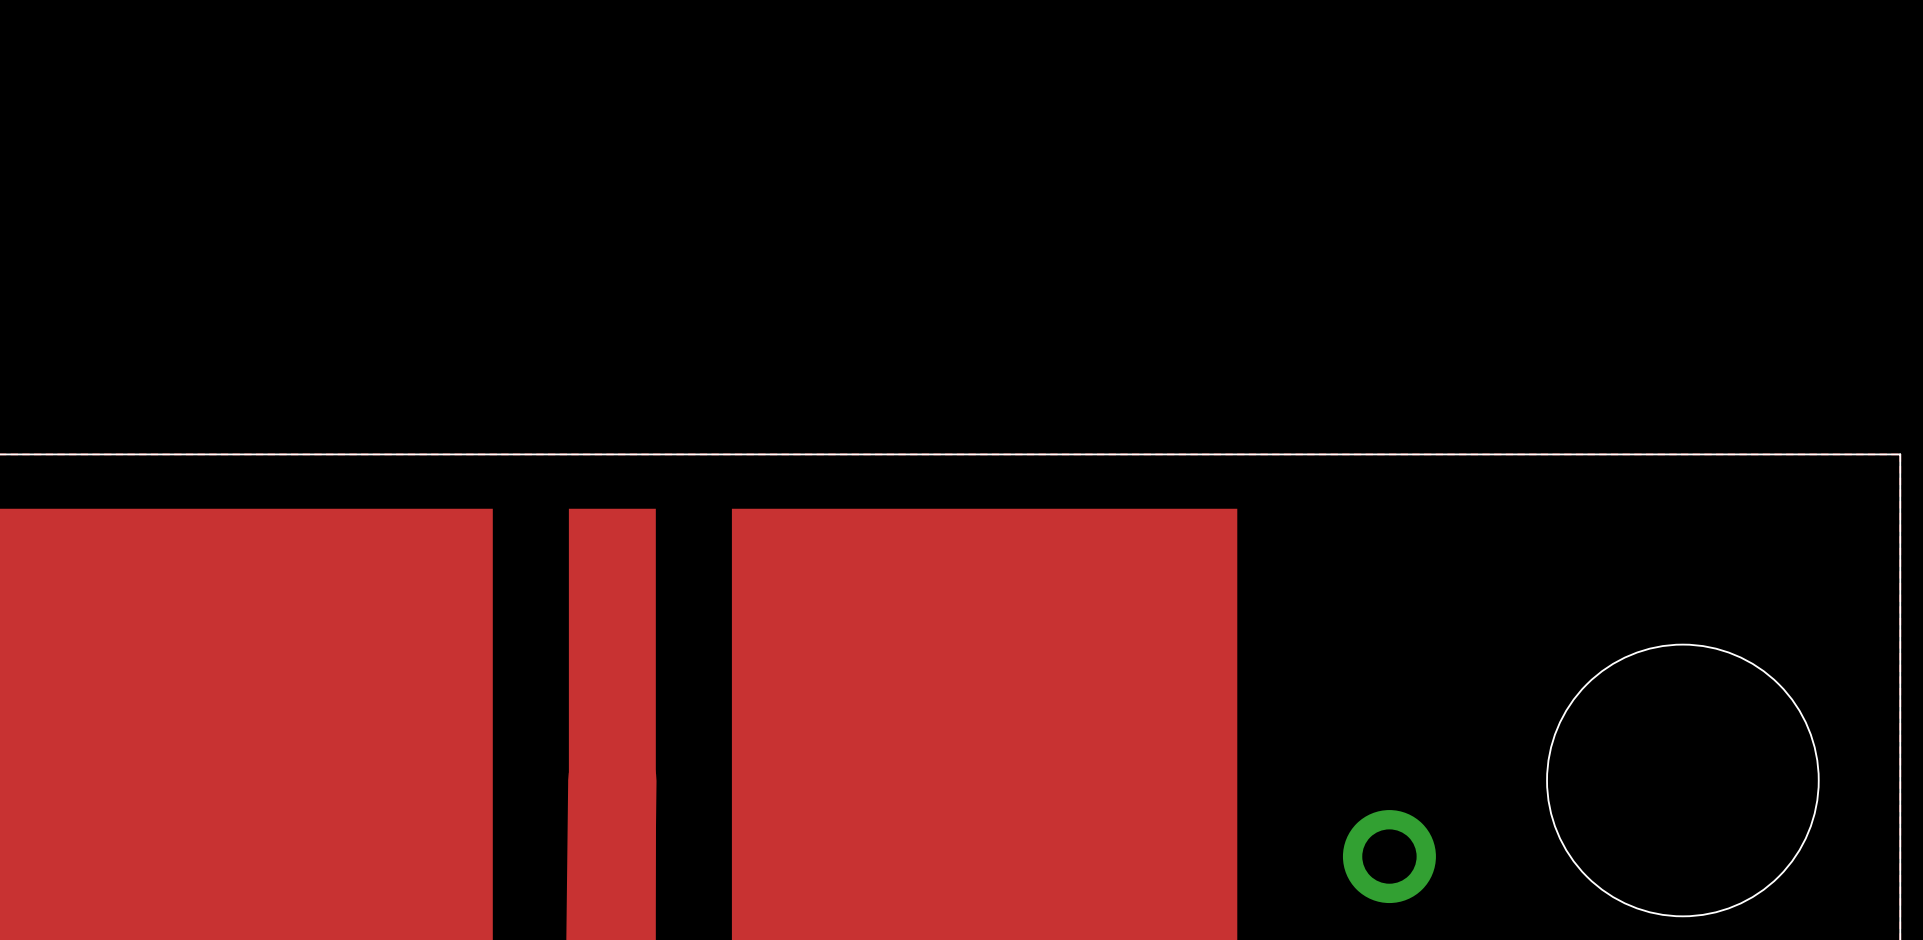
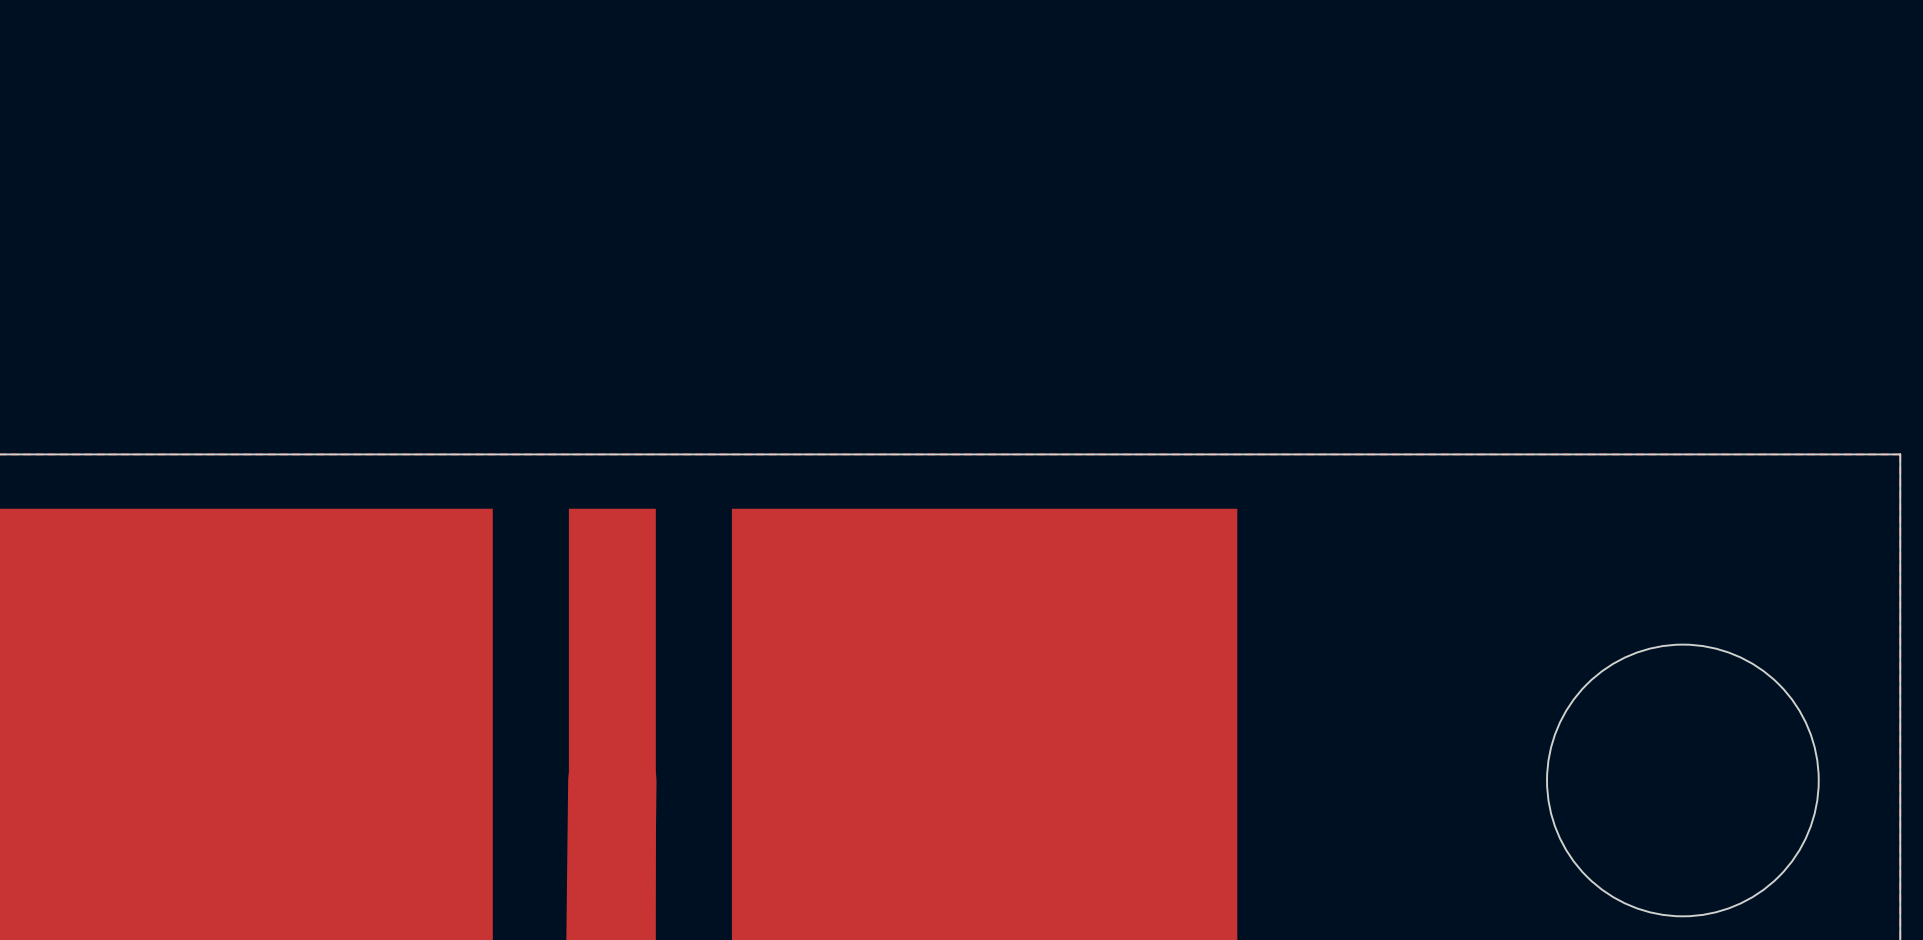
via: (1389, 856) -> none

